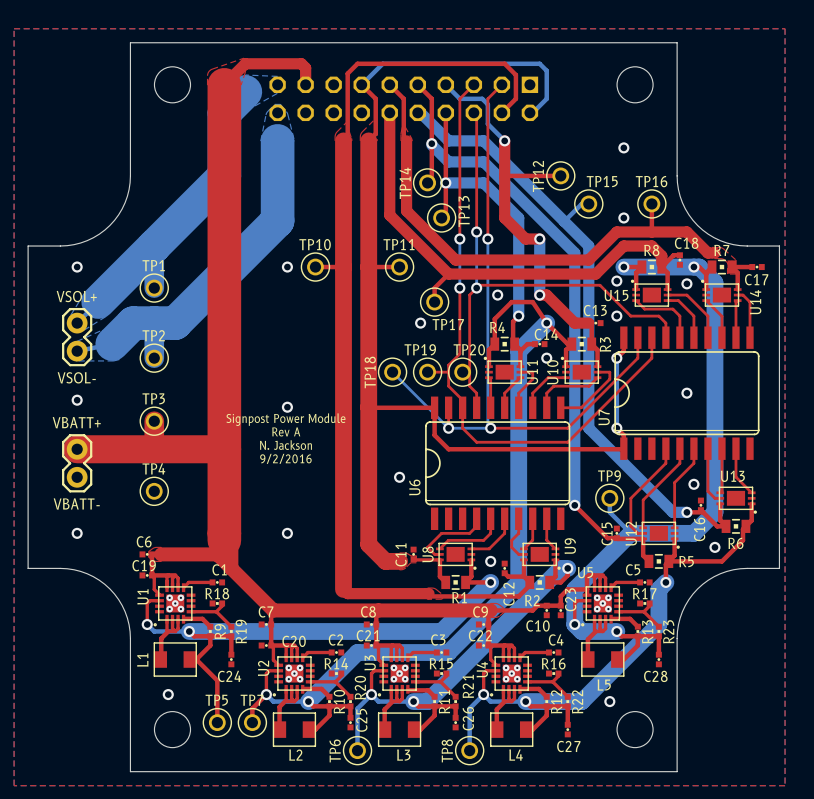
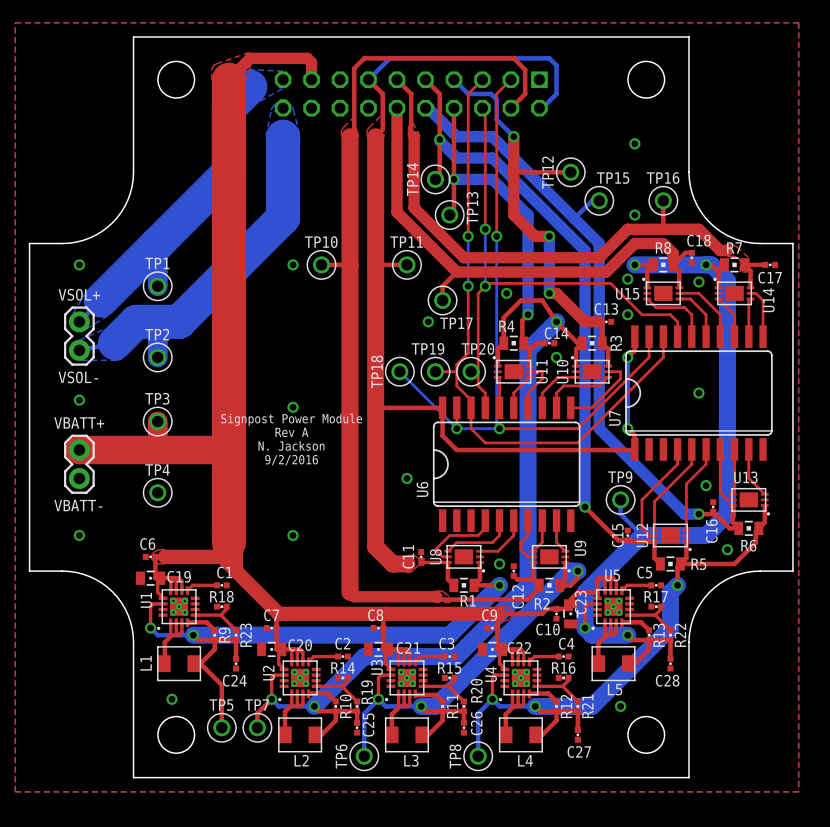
C19 name position: C19 (144, 565) -> C19 (179, 576)
C19 footprint: [139, 572, 155, 579] -> [136, 570, 166, 586]
U5 name position: U5 (585, 572) -> U5 (612, 575)
C23 footprint: [557, 602, 564, 619] -> [563, 599, 579, 629]
R19 name: R19 (241, 631) -> R23 (246, 635)
R23 name: R23 (668, 631) -> R22 (680, 635)
C21 name position: C21 (368, 635) -> C21 (408, 648)
C22 name position: C22 (480, 635) -> C22 (519, 648)
C20 footprint: [258, 642, 275, 649] -> [257, 641, 287, 658]
C21 footprint: [363, 642, 380, 649] -> [363, 641, 394, 658]
C22 footprint: [475, 642, 492, 649] -> [477, 641, 508, 658]
R21 name: R21 (468, 686) -> R20 (476, 690)
R20 name: R20 (360, 687) -> R19 (367, 692)
R22 name: R22 (577, 701) -> R21 (587, 706)

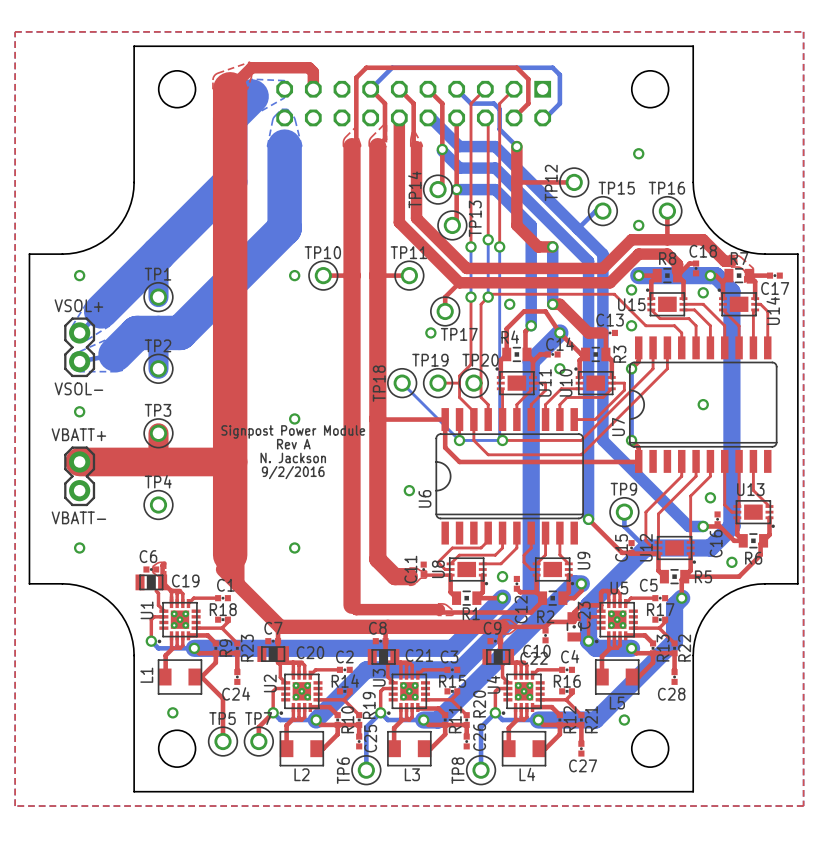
top track: (221, 556) (155, 556) (155, 578) (170, 578) -> (164, 563) (162, 582) (171, 590)
C19 footprint: [136, 570, 166, 586] -> [135, 574, 168, 591]
C10 position: (556, 613) -> (545, 635)
C20 footprint: [257, 641, 287, 658] -> [257, 646, 289, 662]
C21 footprint: [363, 641, 394, 658] -> [367, 649, 400, 665]
C22 footprint: [477, 641, 508, 658] -> [482, 649, 515, 665]

